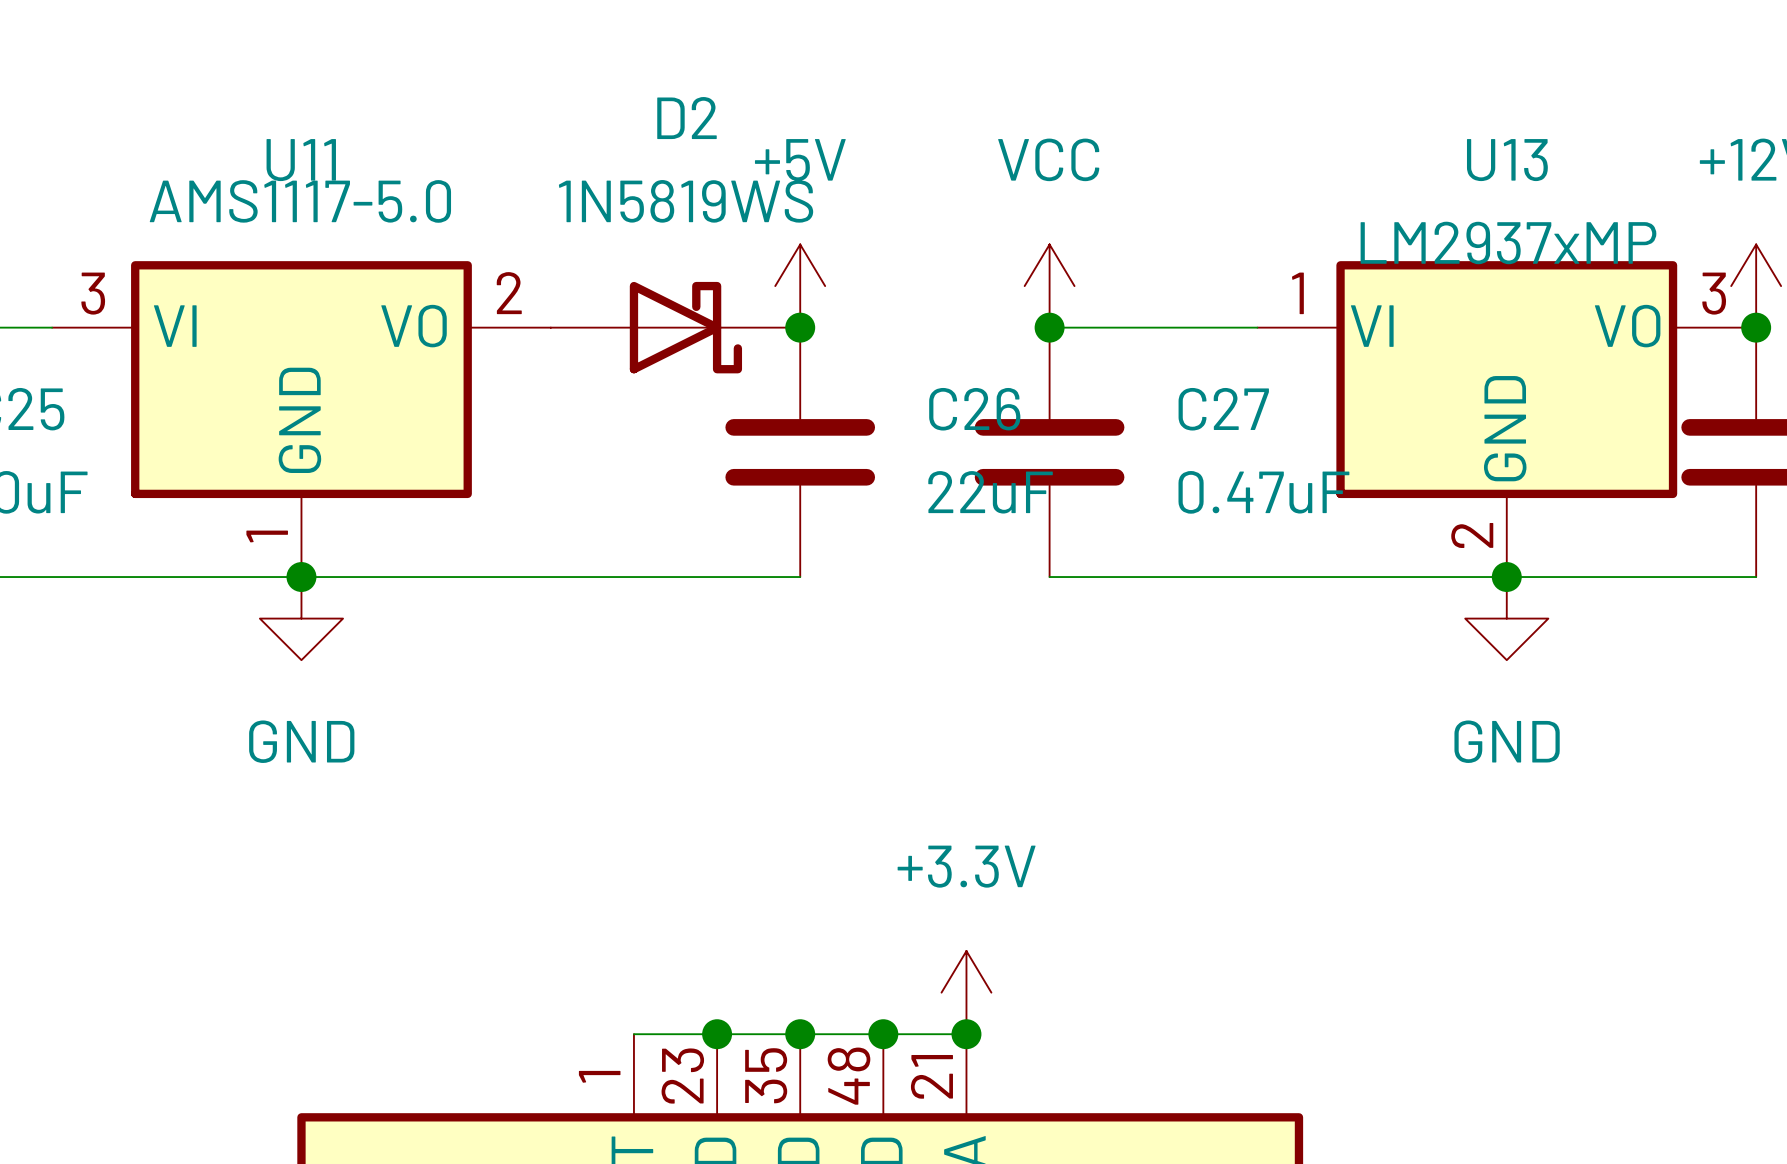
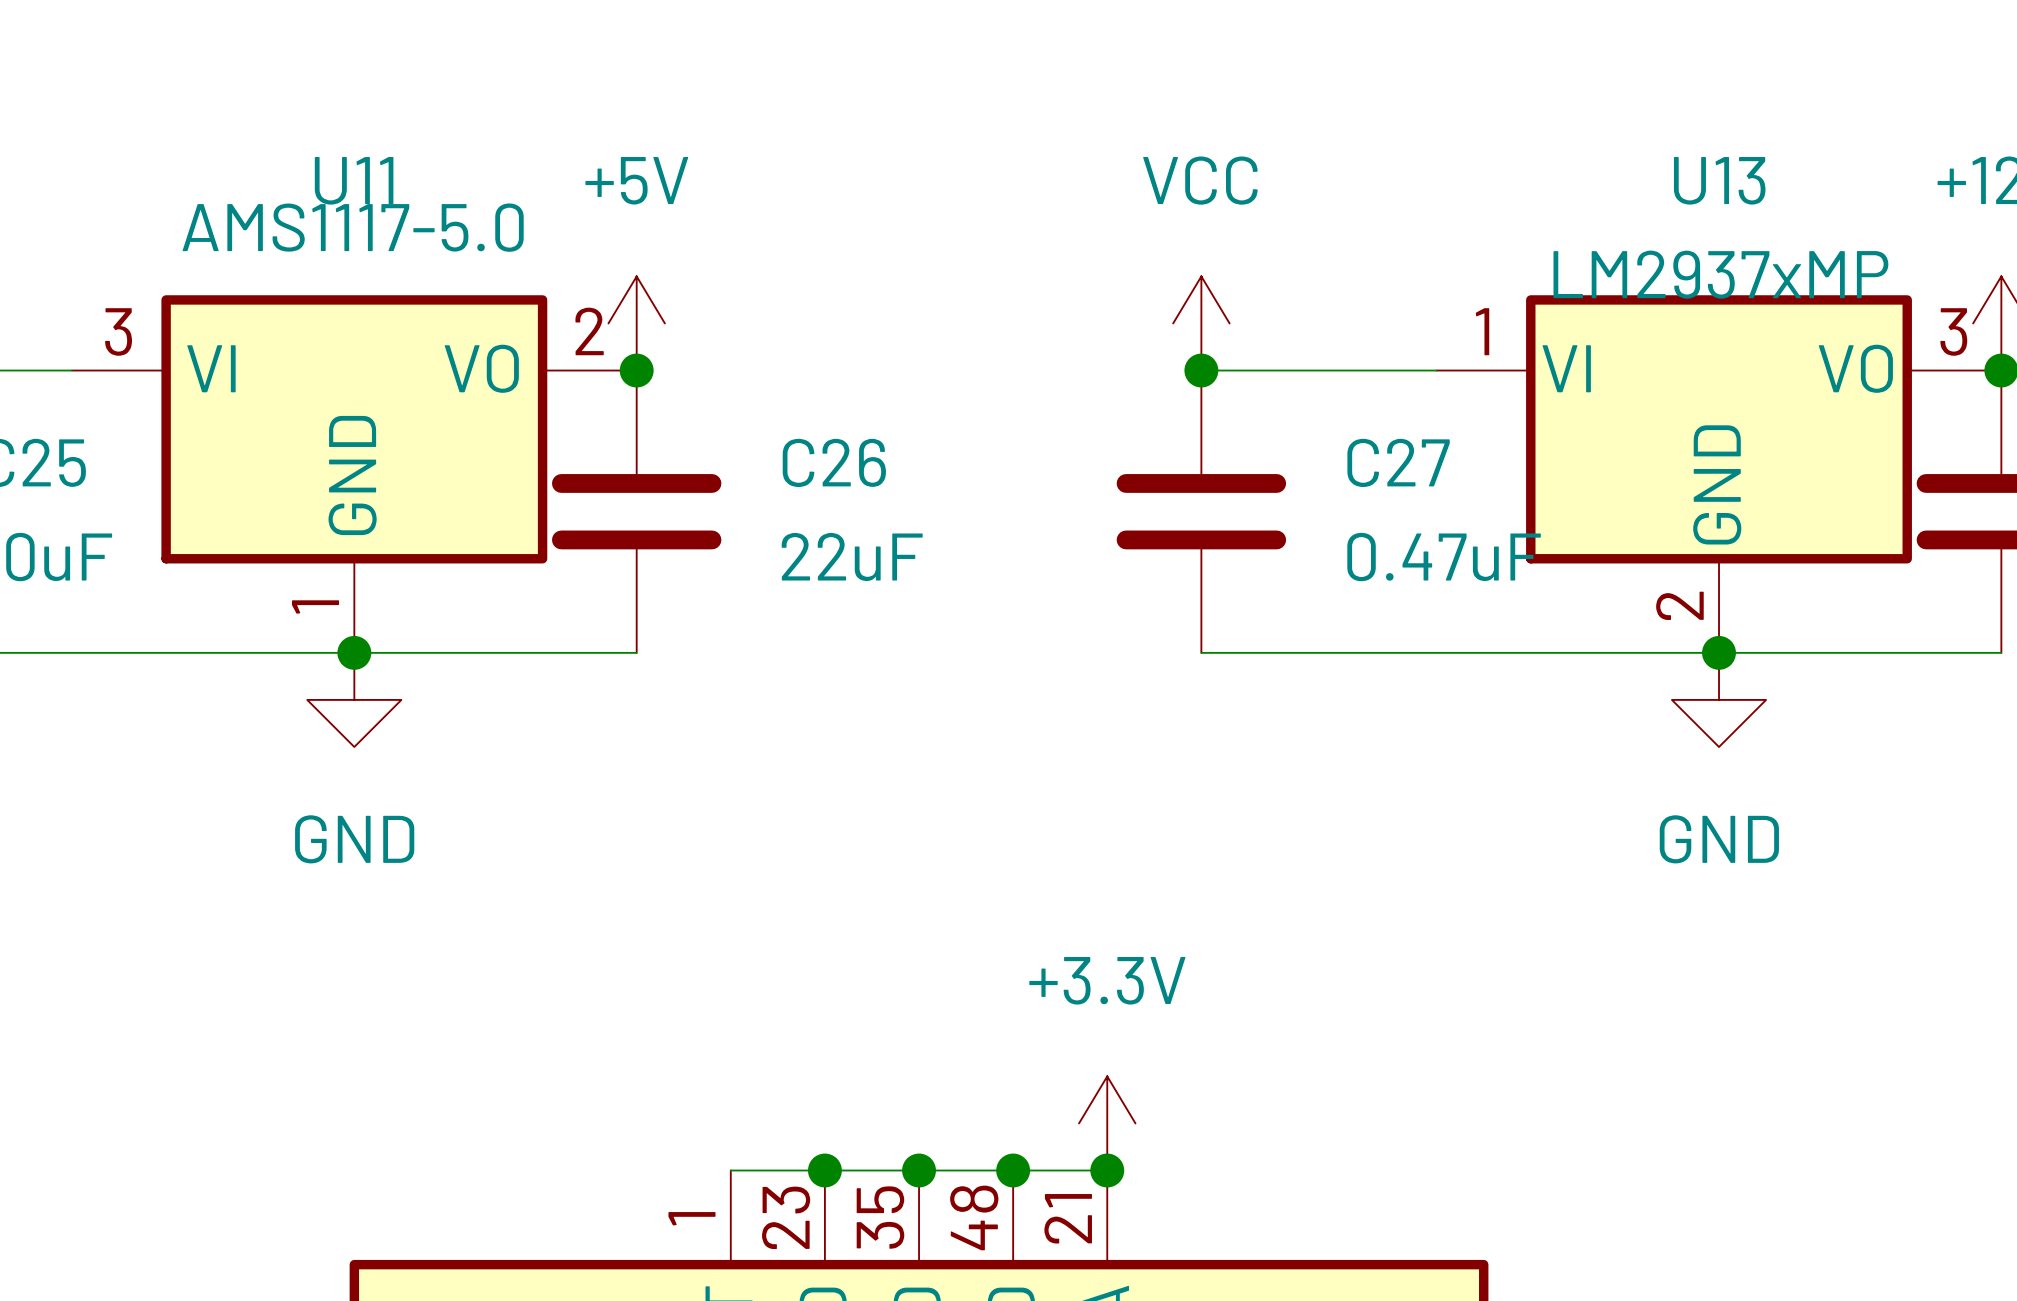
power symbol position: +5V (800, 286) -> +5V (636, 323)
junction: none -> (636, 370)
D2: 1N5819WS (675, 327) -> none
junction: (800, 327) -> none
C26 position: (800, 452) -> (636, 511)
wire: (550, 577) (800, 577) -> none

